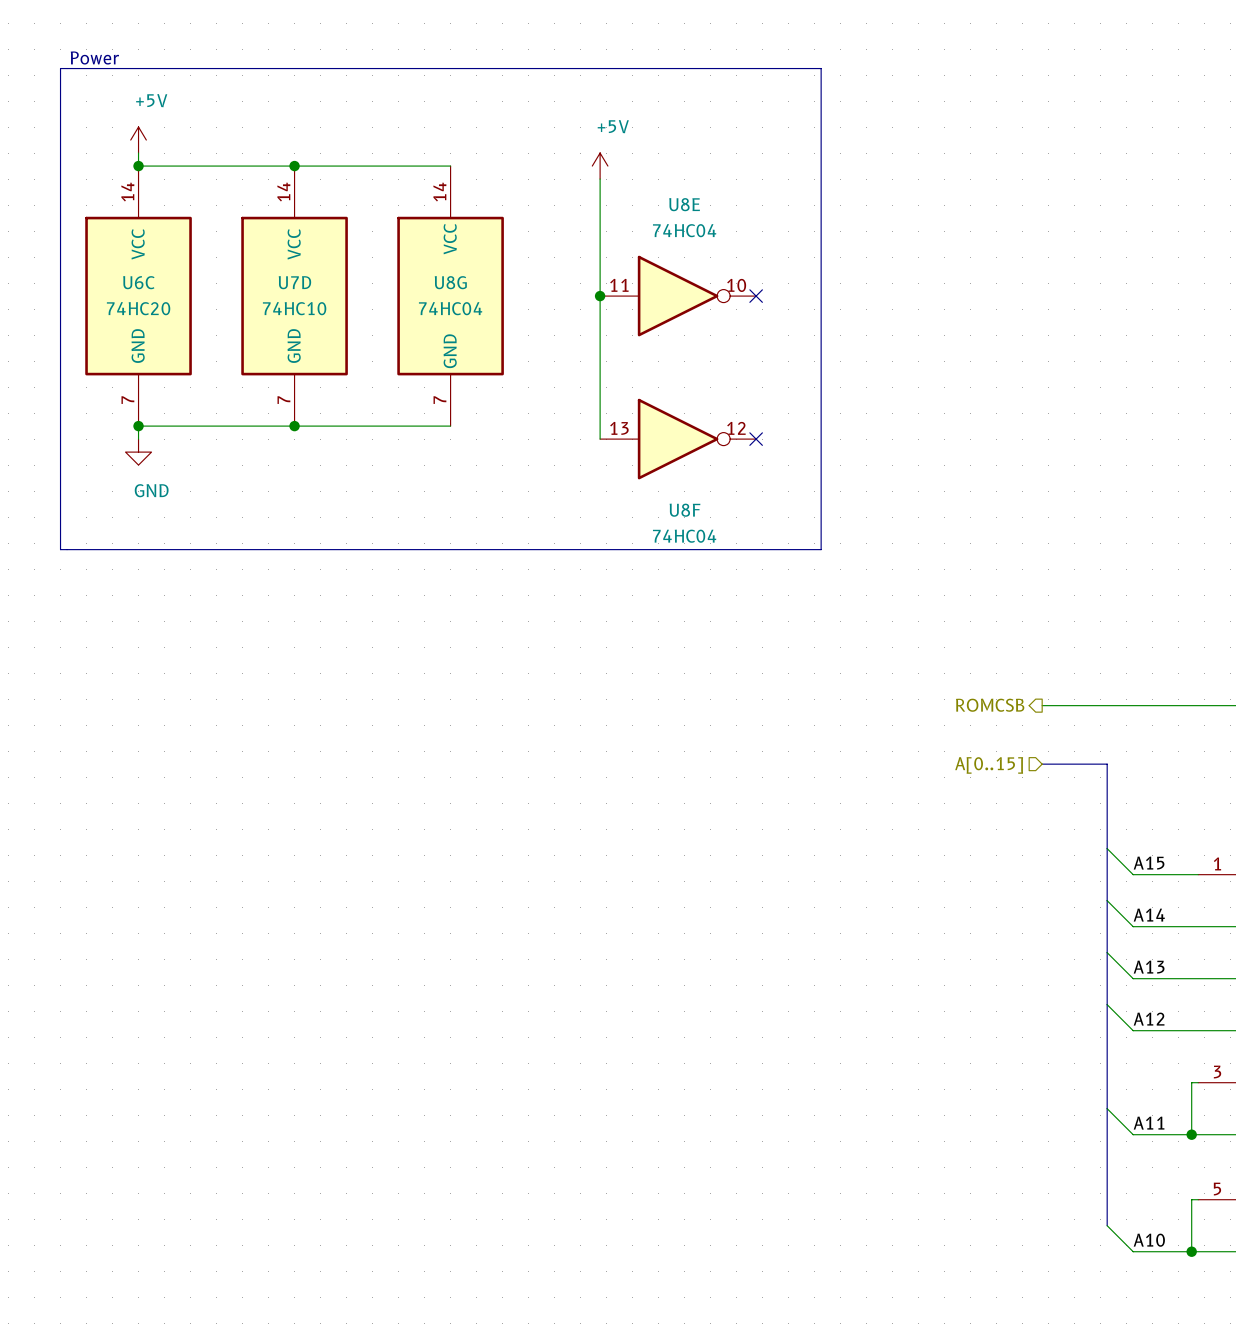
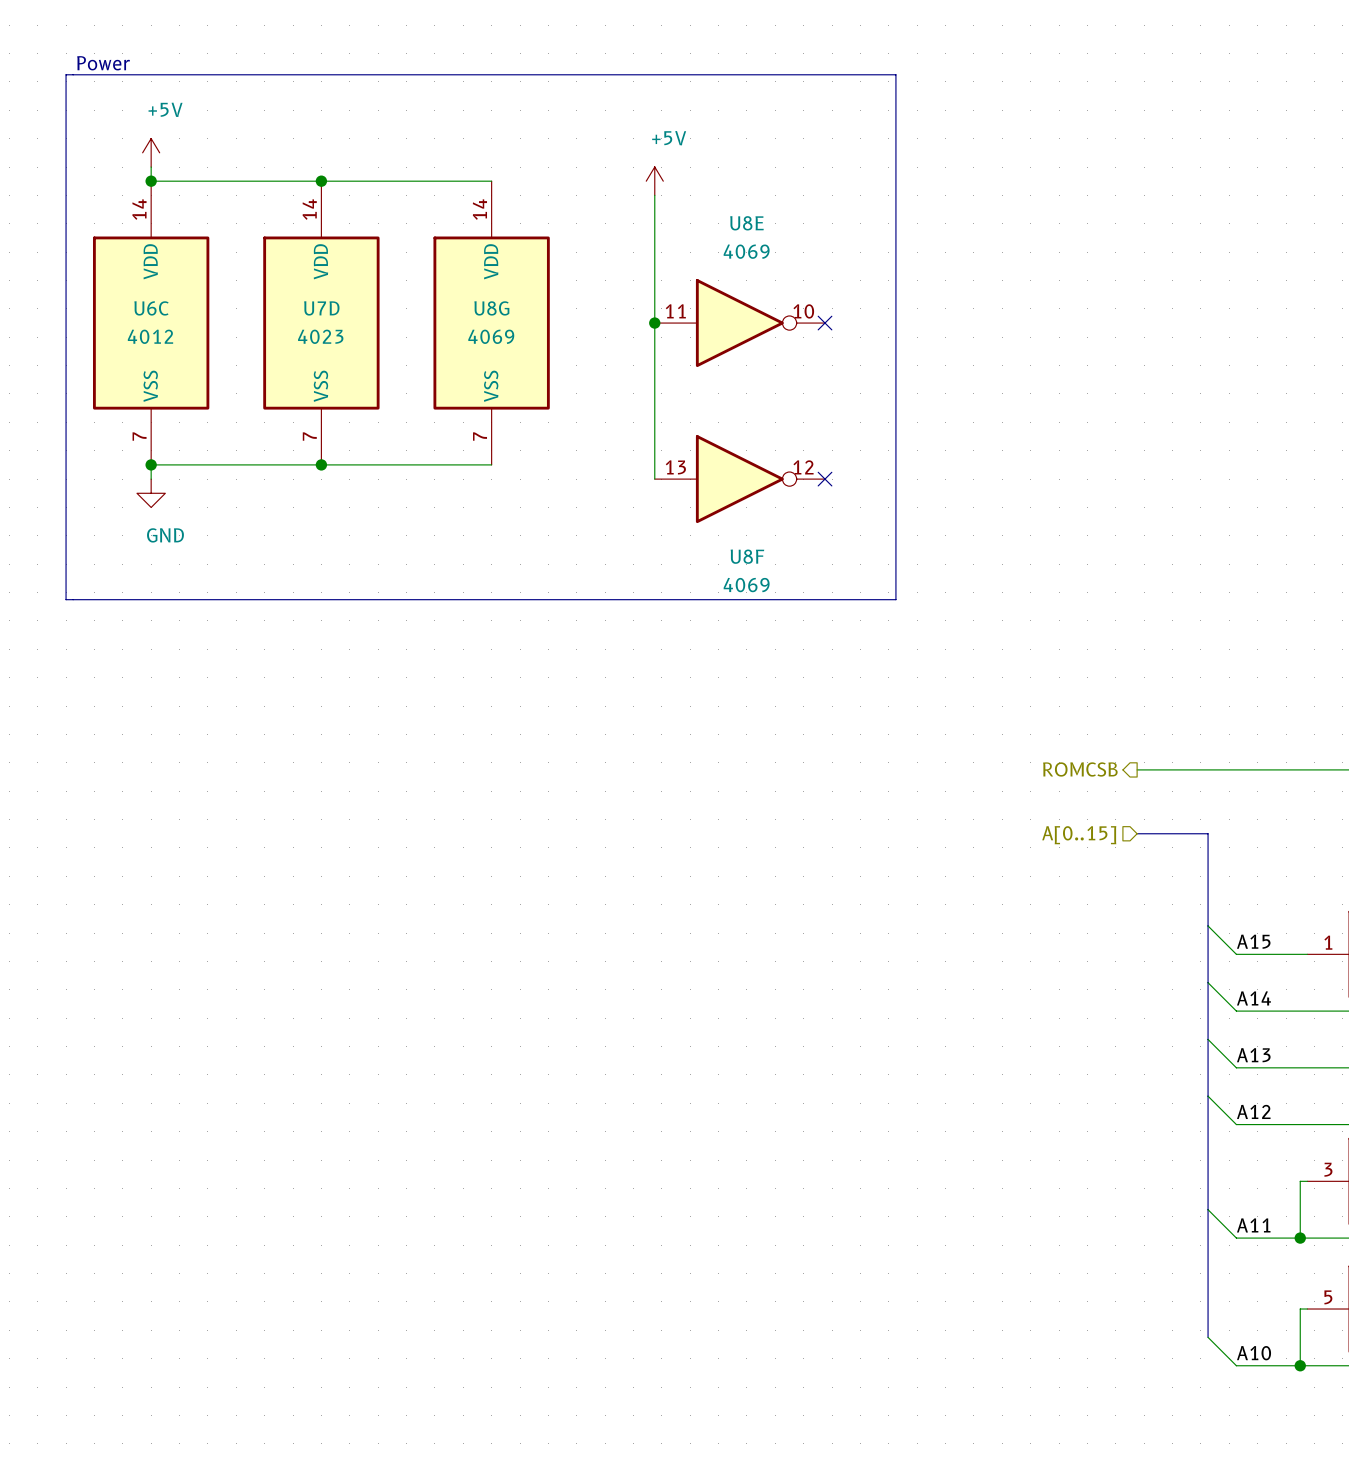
U8E value: 74HC04 (684, 230) -> 4069 (746, 251)
U8G pin name: VCC (450, 239) -> VDD (491, 261)
U6C pin name: VCC (138, 244) -> VDD (150, 261)
U7D pin name: VCC (294, 244) -> VDD (320, 261)
U6C value: 74HC20 (138, 308) -> 4012 (150, 336)
U7D value: 74HC10 (294, 308) -> 4023 (320, 336)
U8G value: 74HC04 (450, 308) -> 4069 (491, 336)
U6C pin name: GND (138, 346) -> VSS (150, 386)
U7D pin name: GND (294, 346) -> VSS (320, 386)
U8G pin name: GND (450, 351) -> VSS (491, 386)
U8F value: 74HC04 (684, 536) -> 4069 (746, 585)

